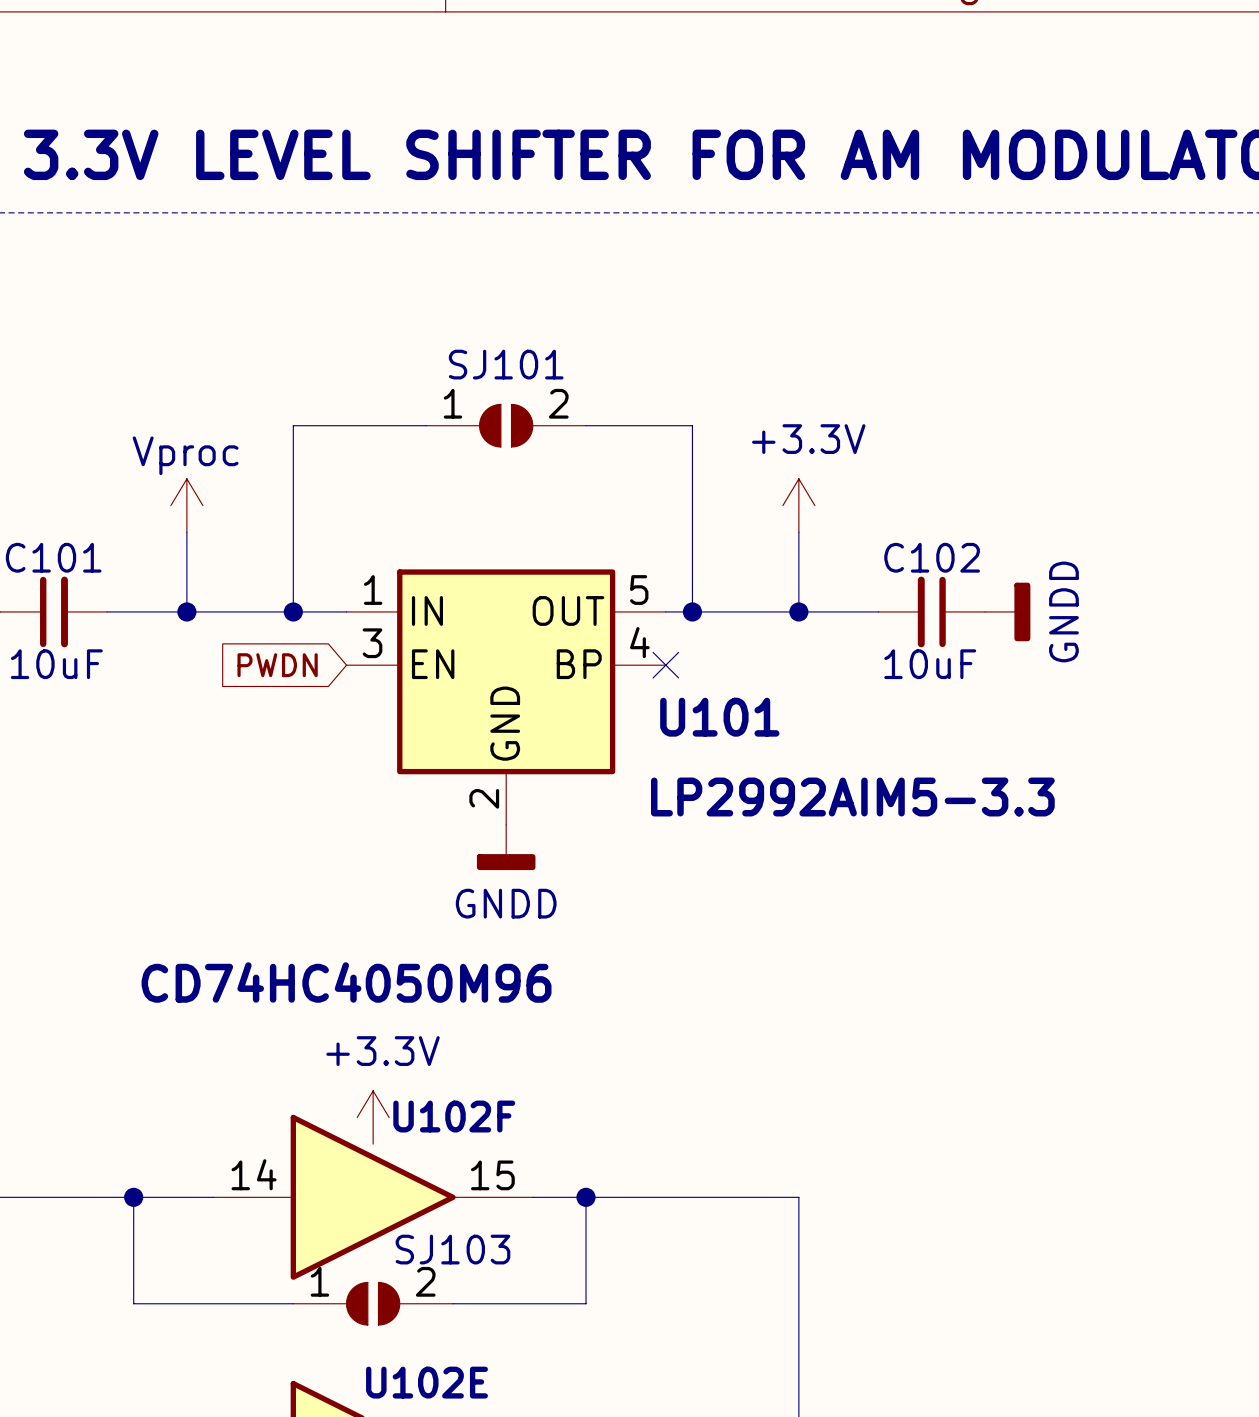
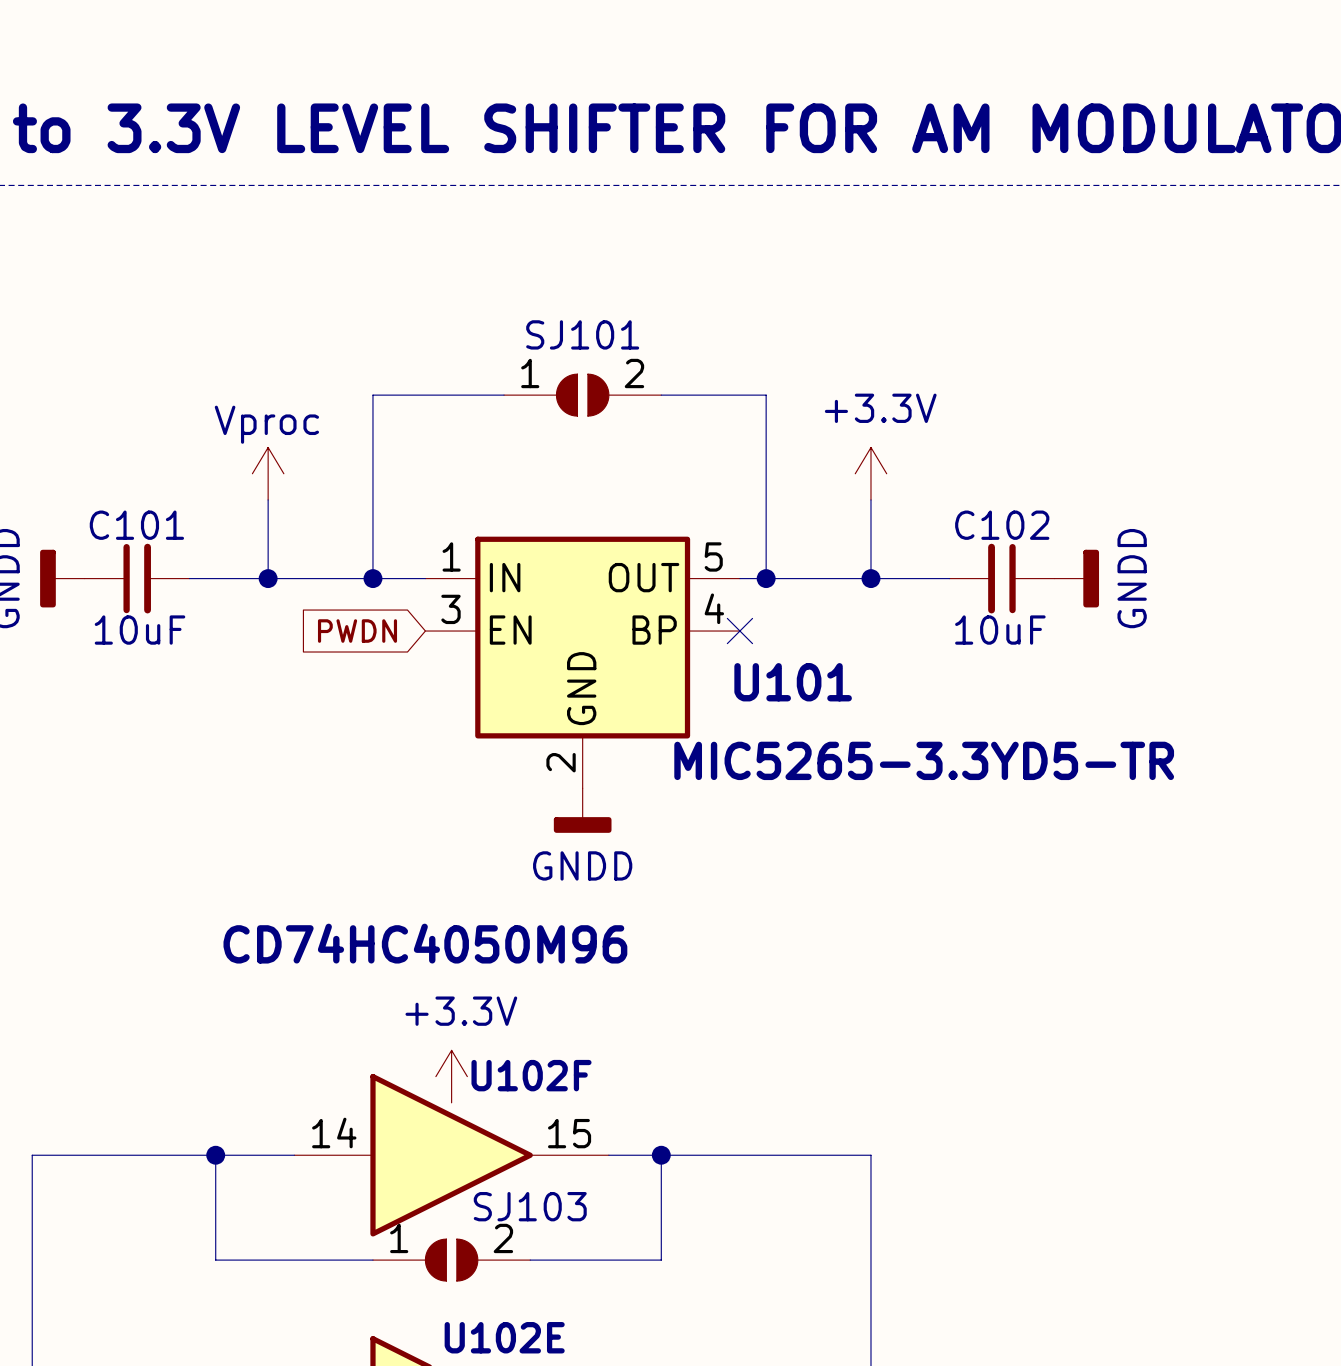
U101 value: LP2992AIM5-3.3 (852, 797) -> MIC5265-3.3YD5-TR (924, 760)

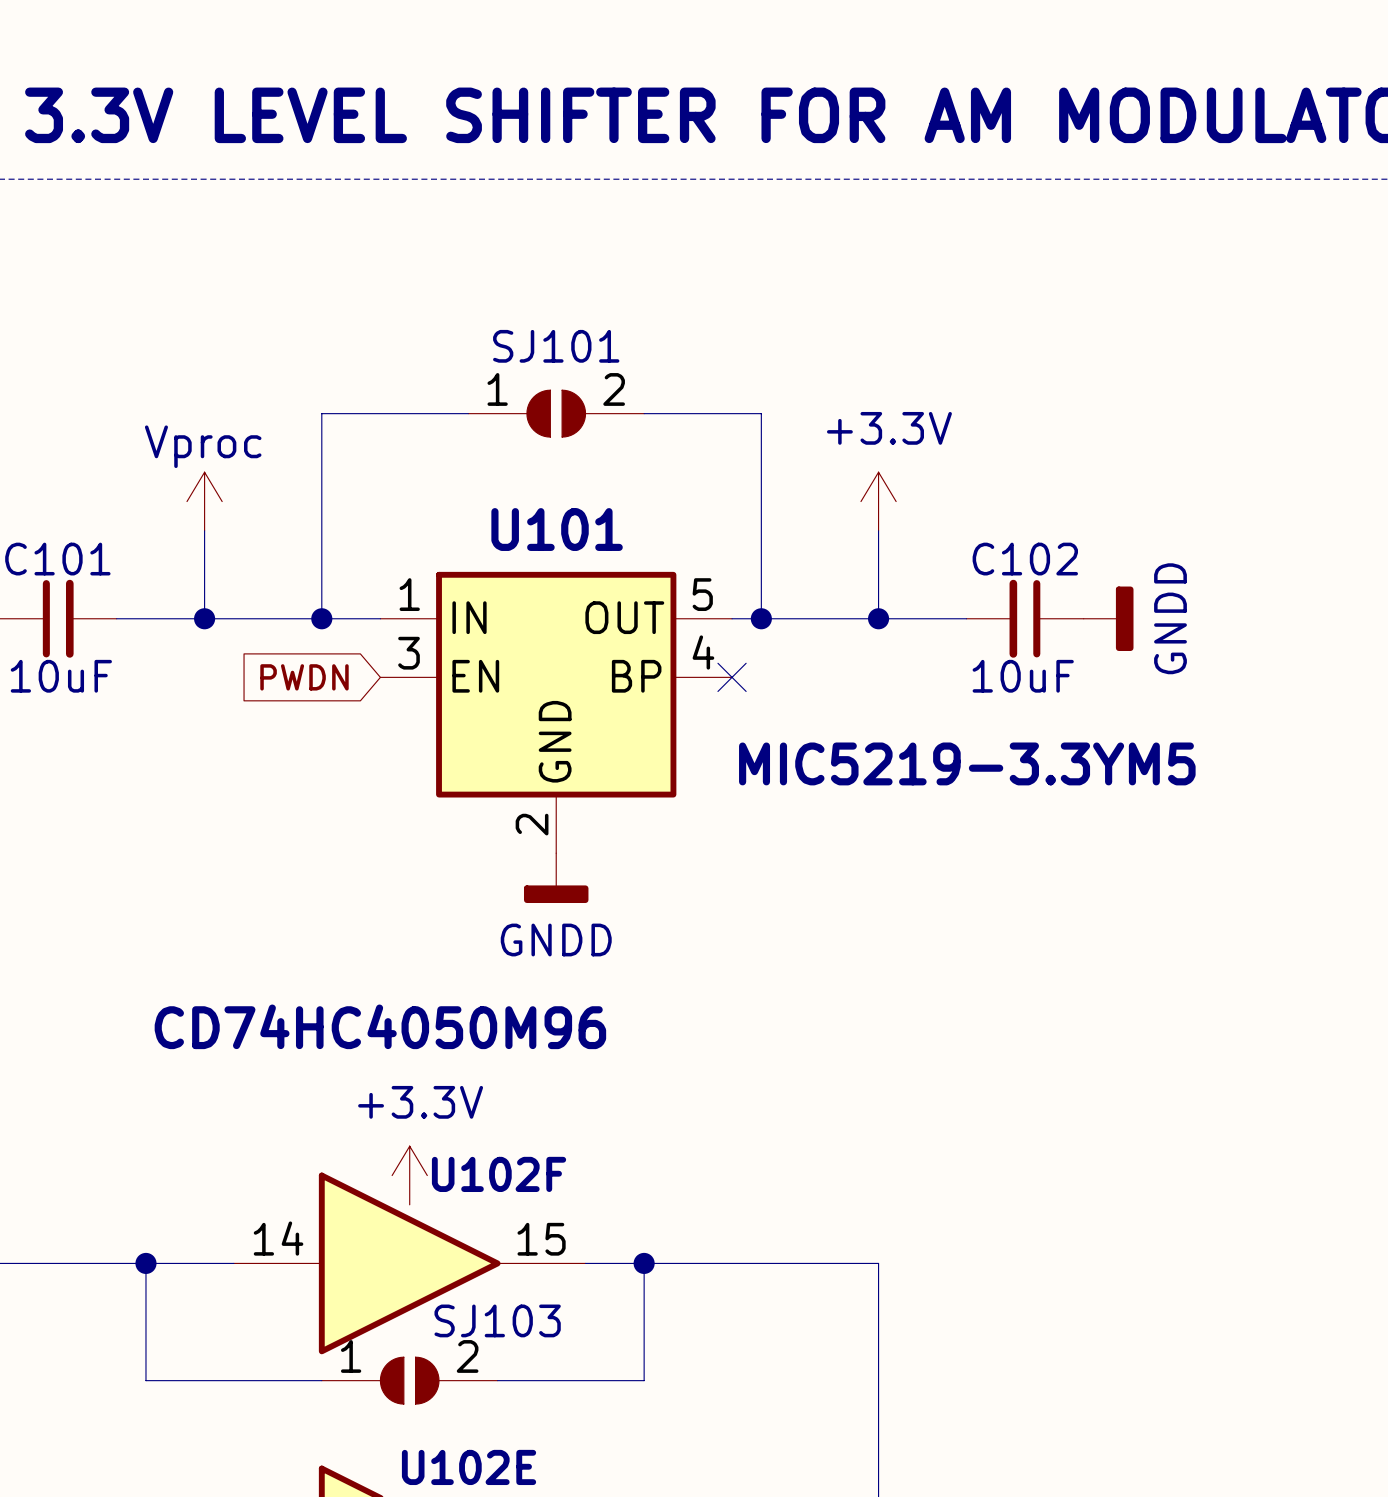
U101 name position: U101 (793, 682) -> U101 (557, 529)
U101 value: MIC5265-3.3YD5-TR (924, 760) -> MIC5219-3.3YM5 (967, 763)

